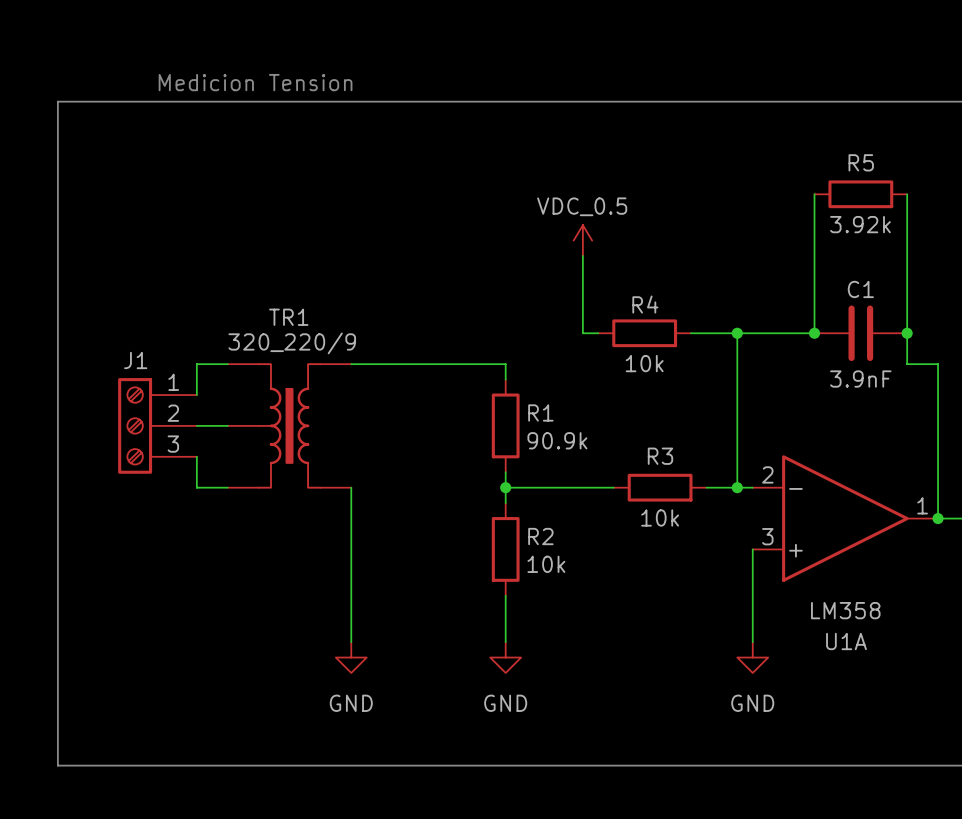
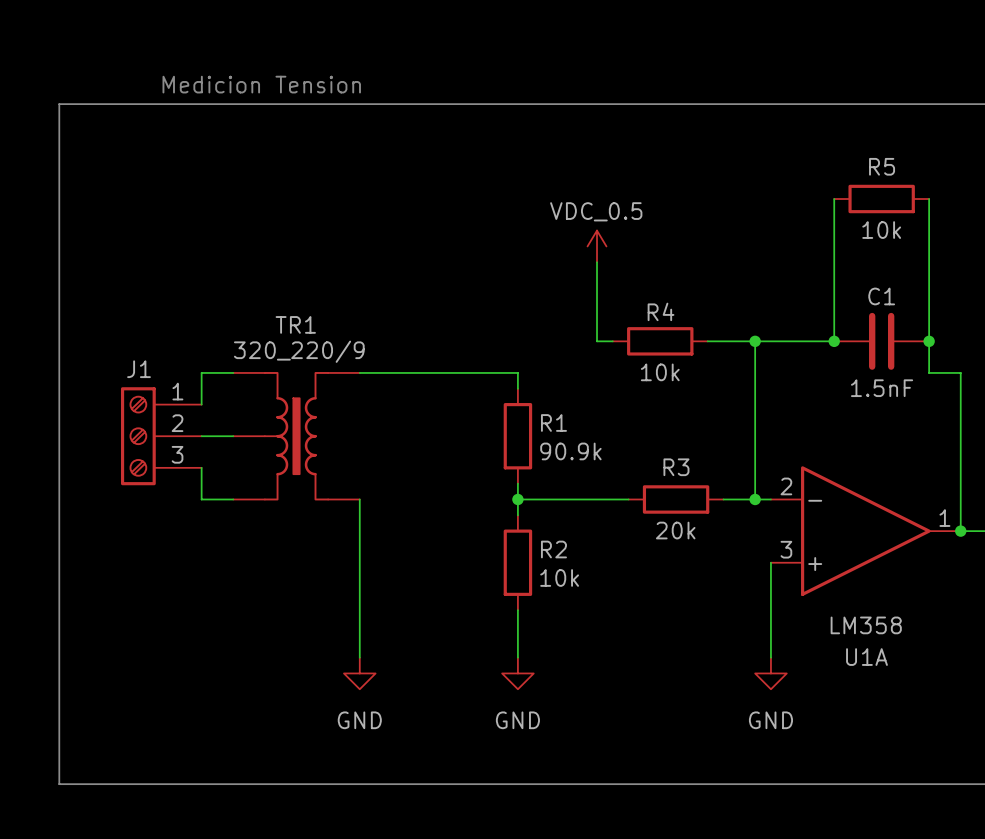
R5 value: 3.92k (860, 224) -> 10k (881, 230)
C1 value: 3.9nF (860, 379) -> 1.5nF (882, 388)
R3 value: 10k (660, 517) -> 20k (675, 530)

